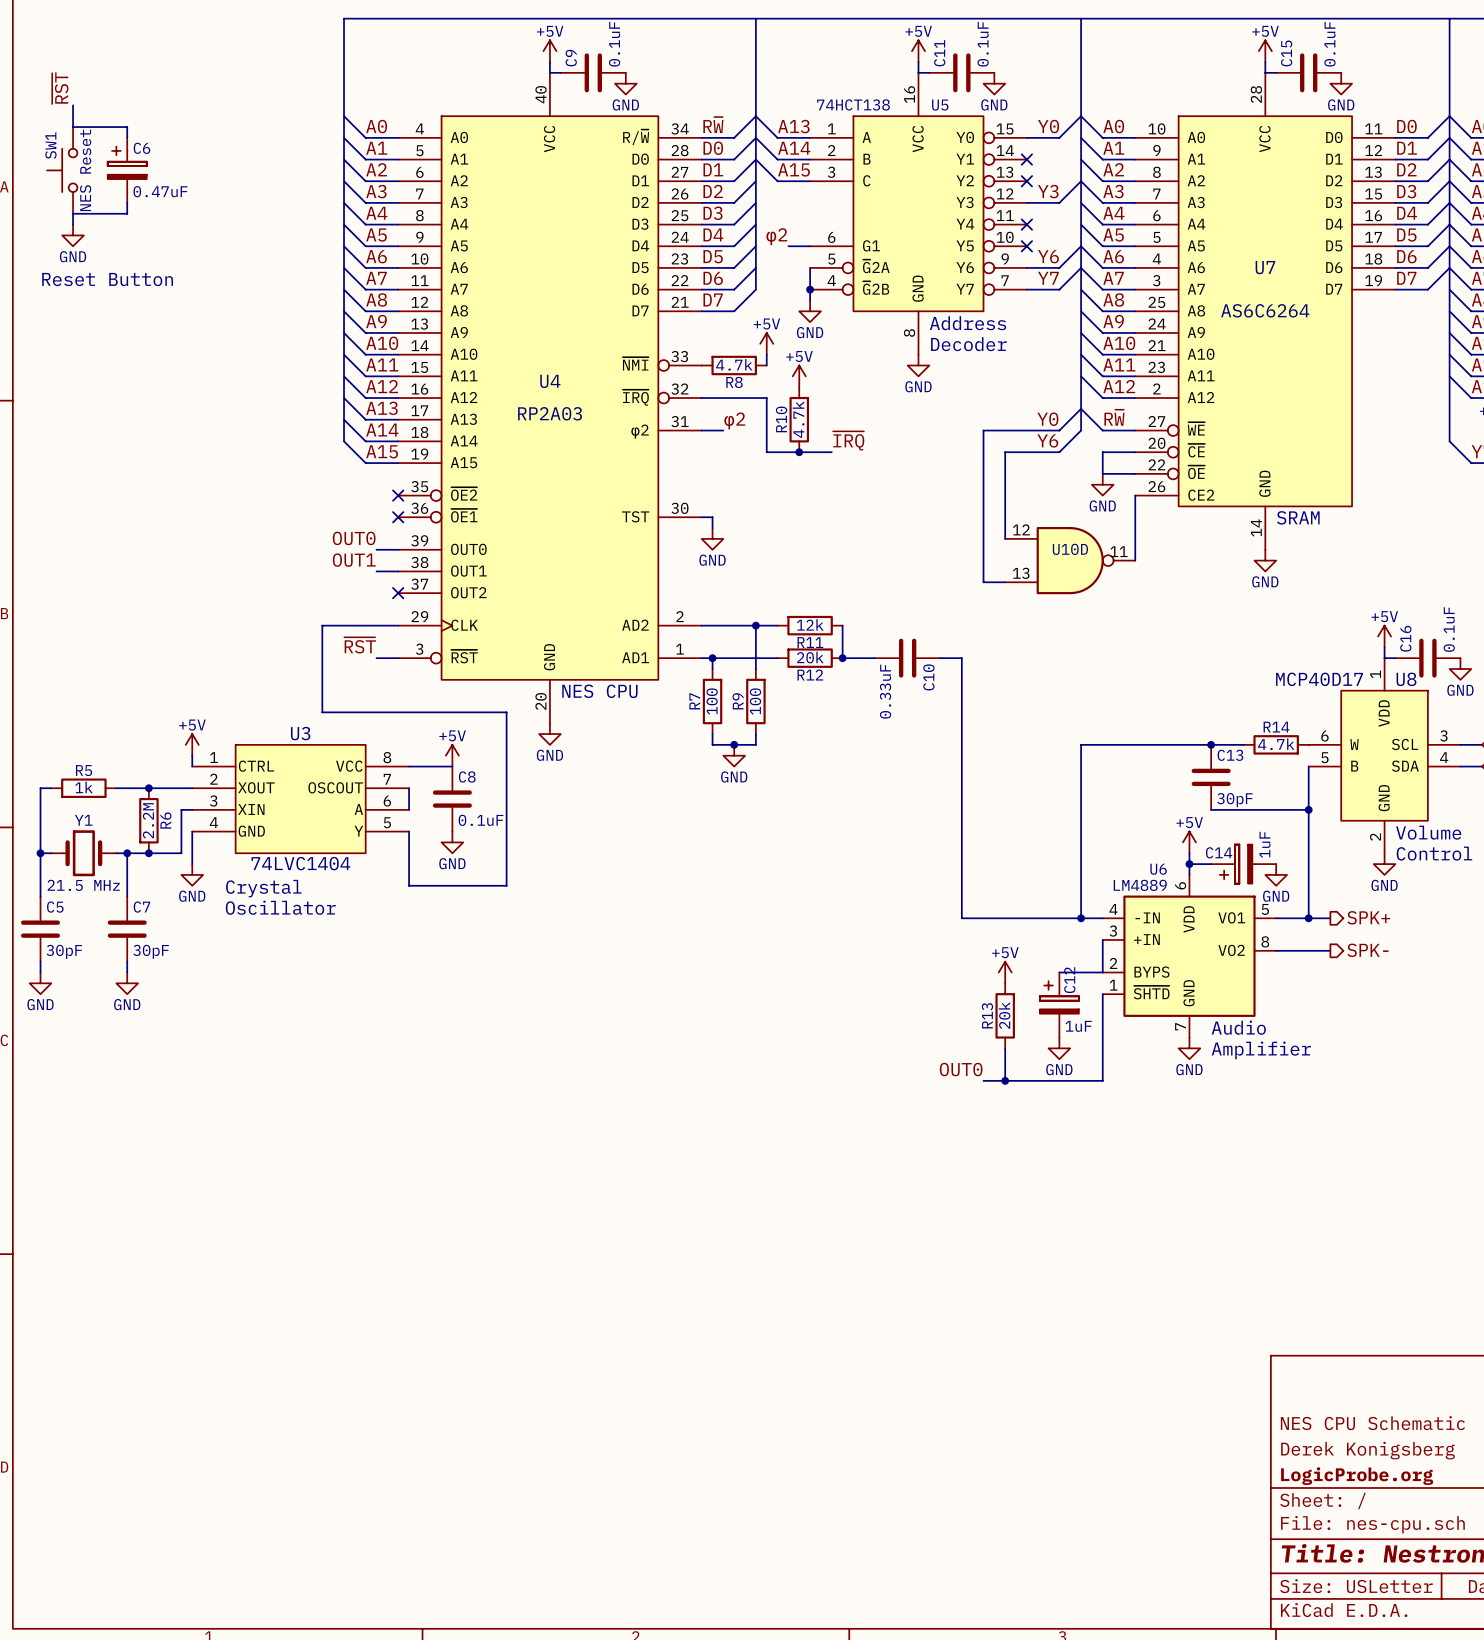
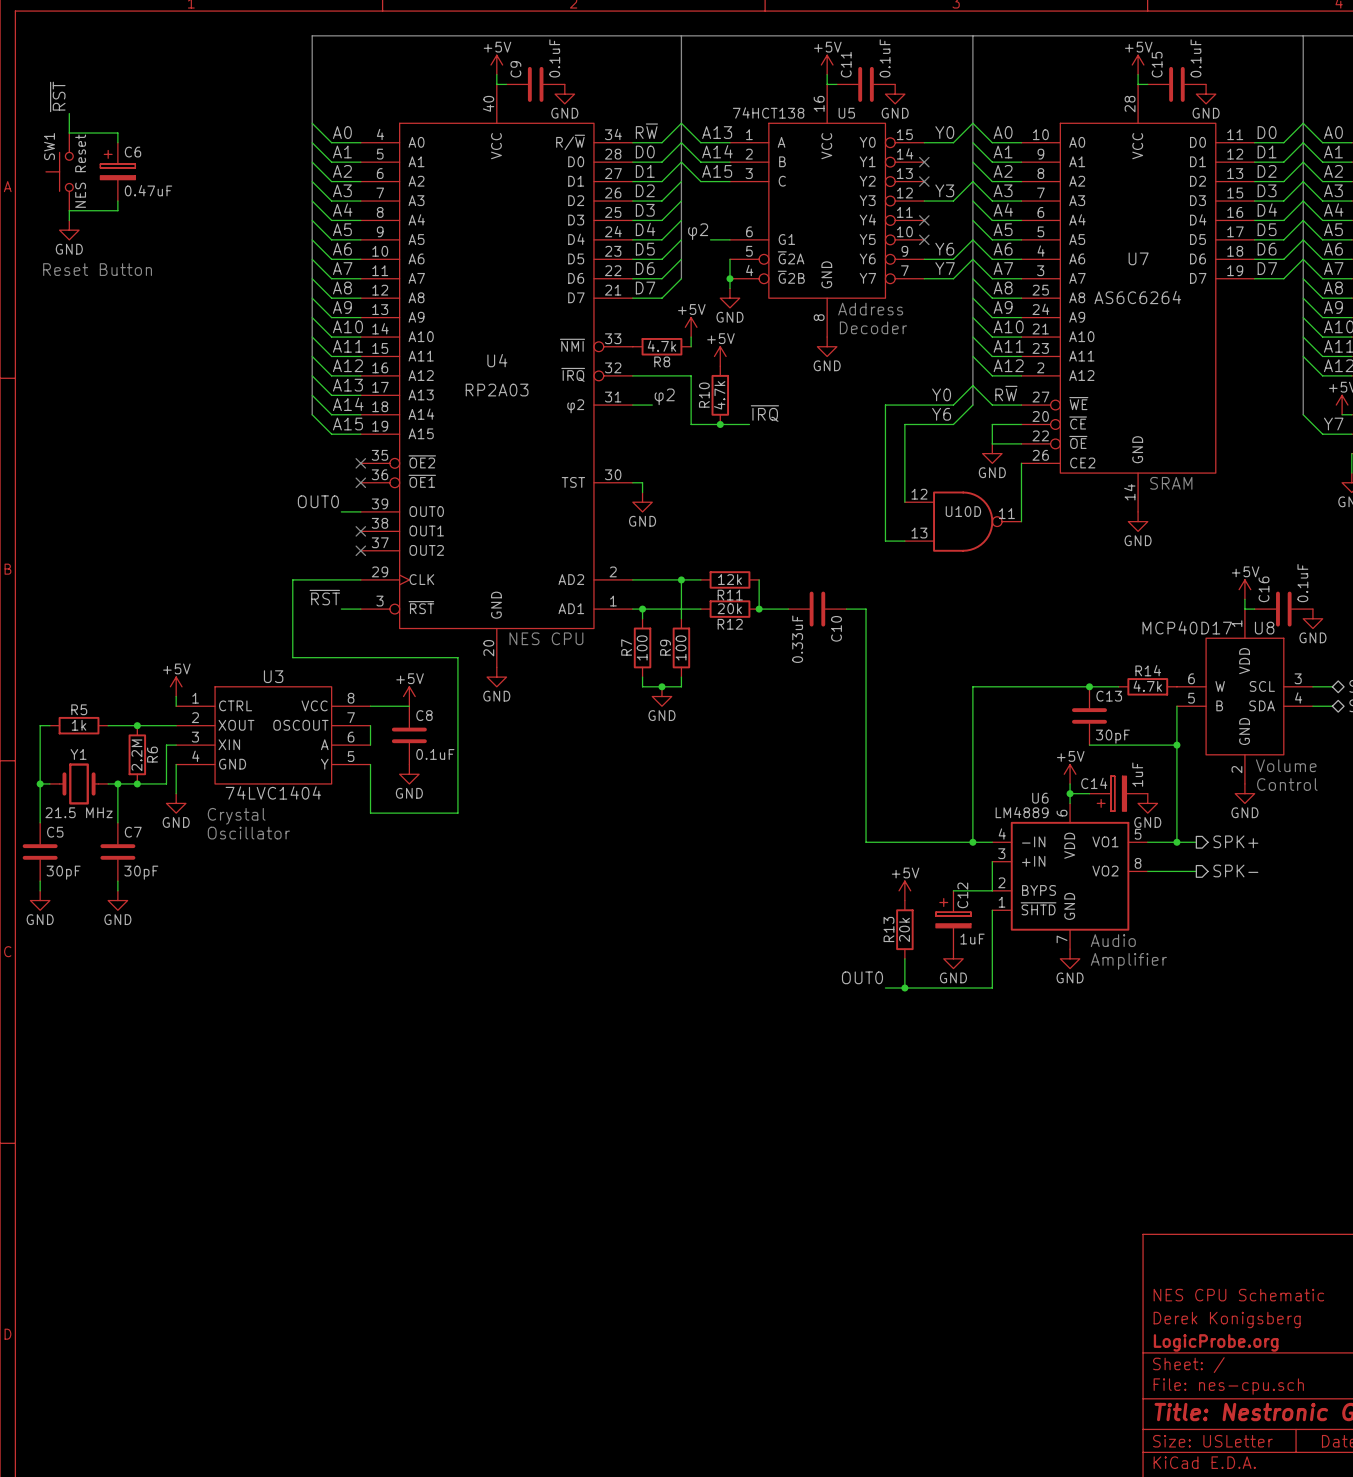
label: OUT1 (354, 560) -> none
wire: (376, 571) (398, 571) -> none
no-connect mark: none -> (360, 531)

